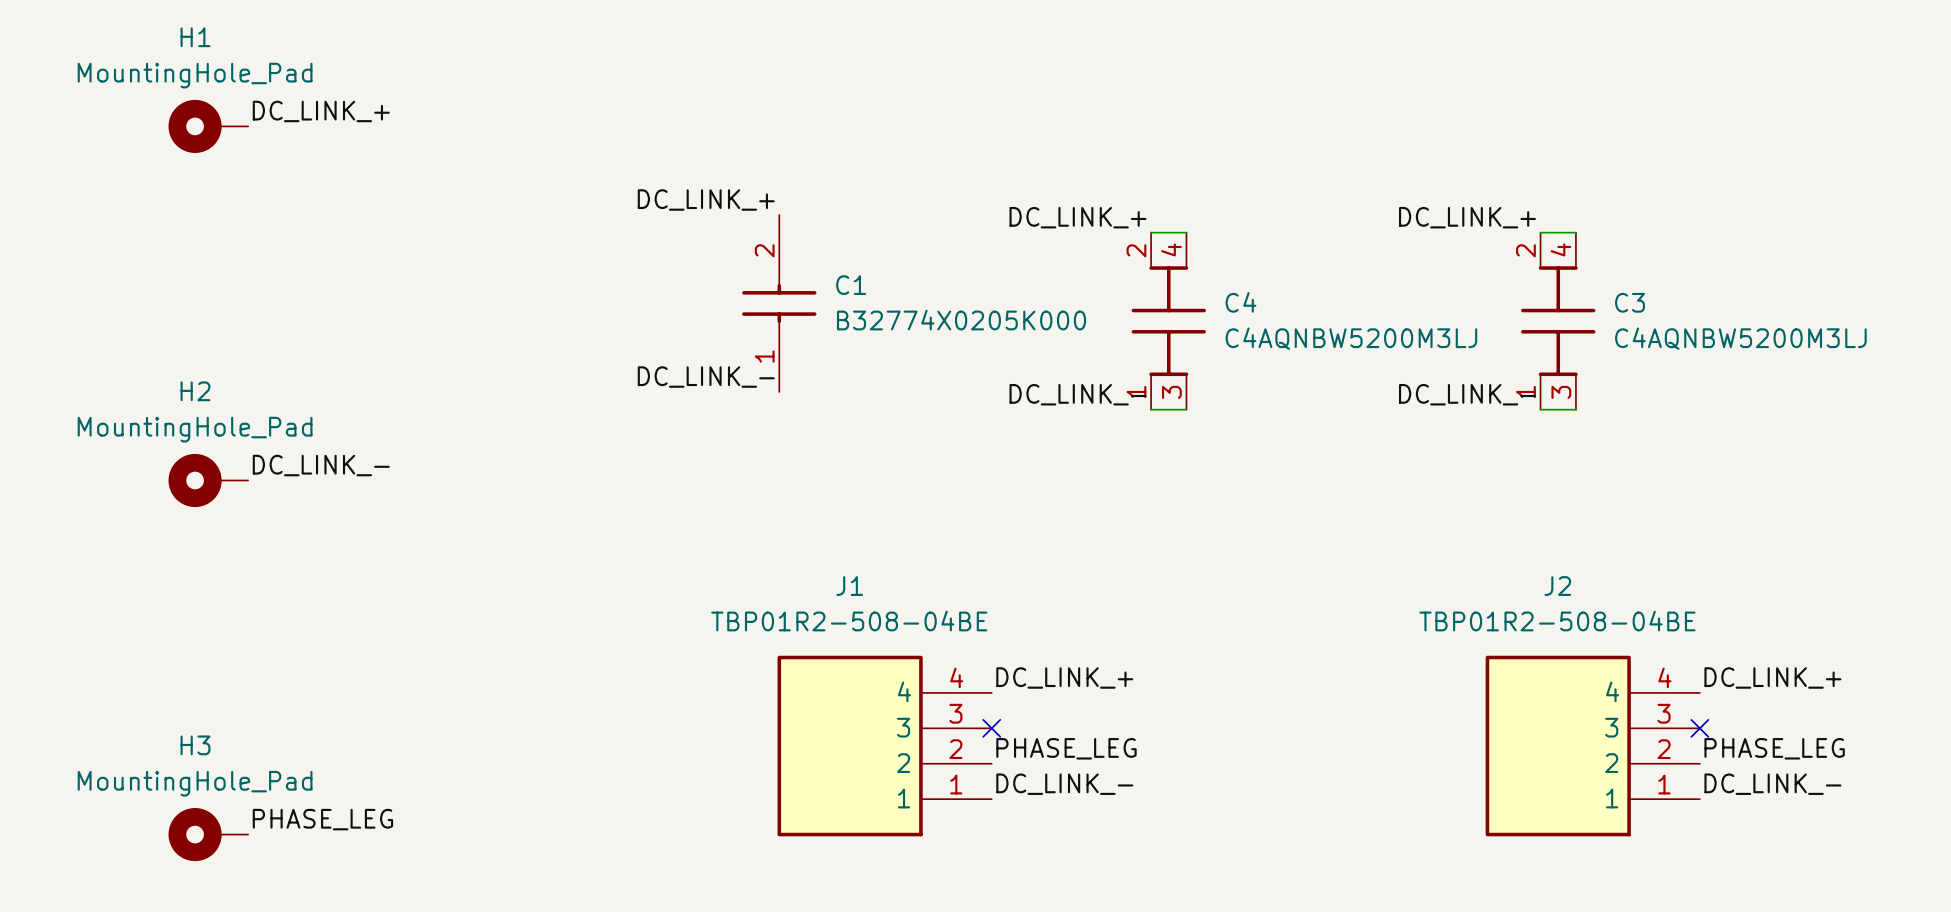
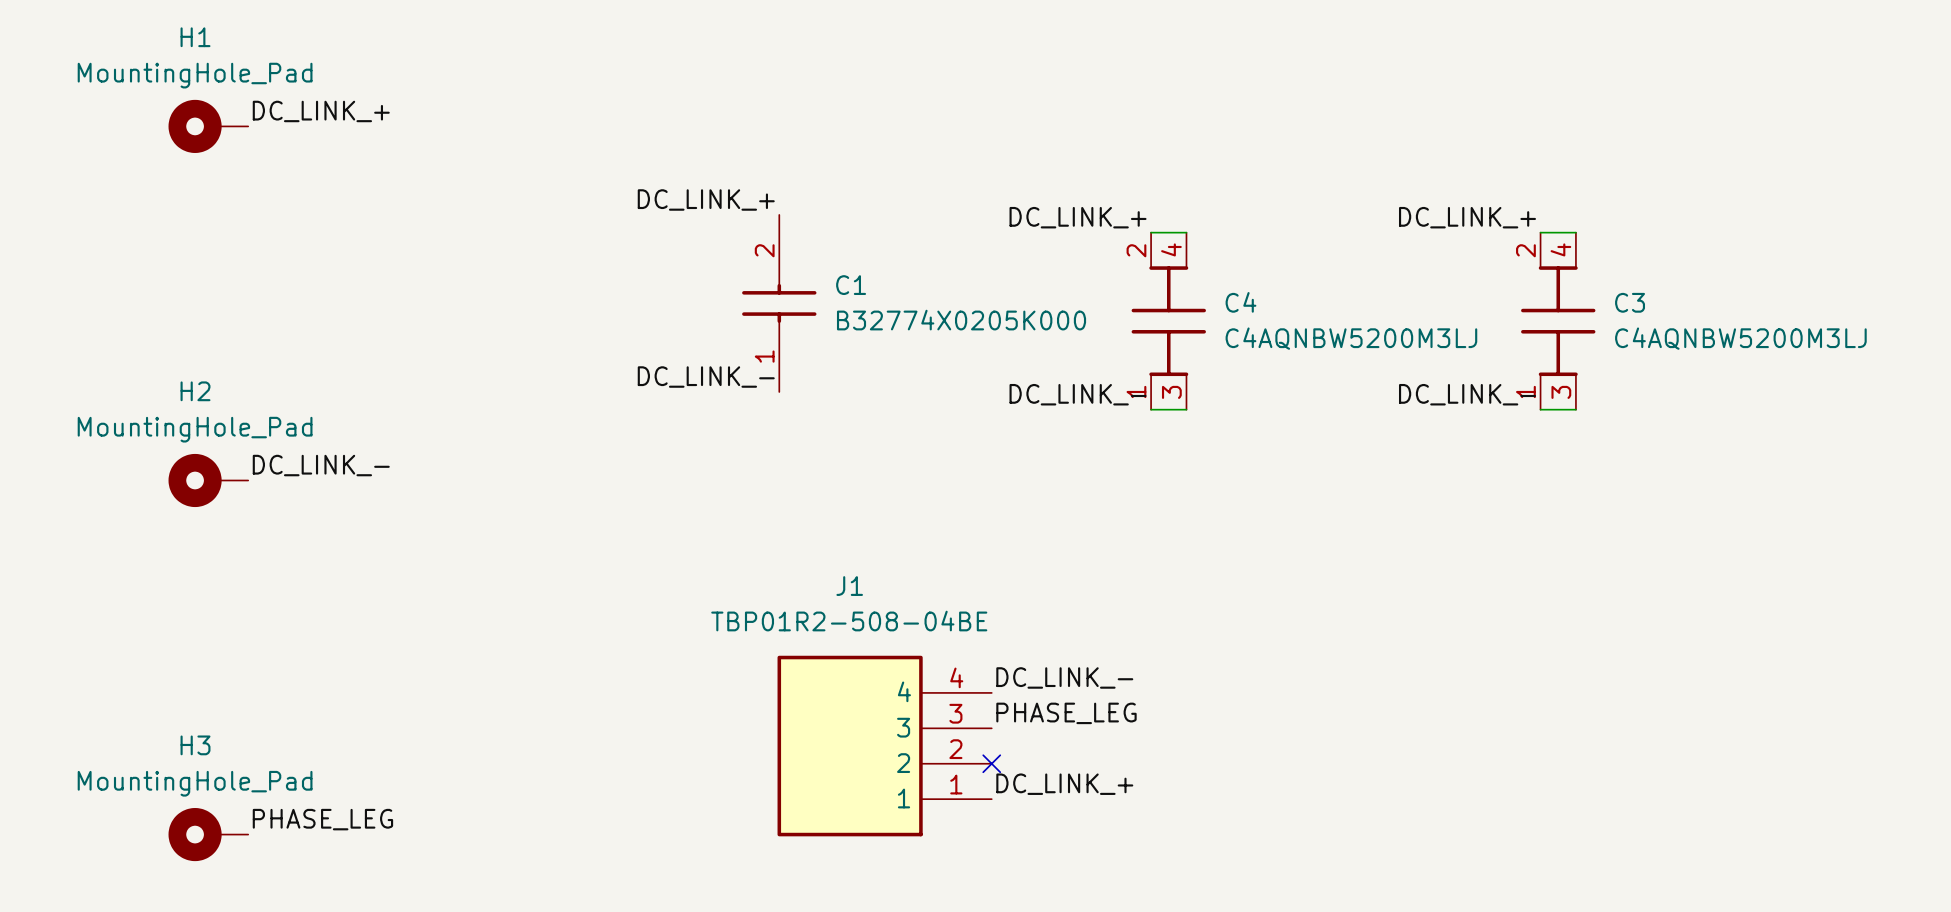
label: DC_LINK_+ (1064, 677) -> DC_LINK_- (1064, 677)
label: DC_LINK_+ (1772, 677) -> none
no-connect mark position: (991, 728) -> (991, 763)
no-connect mark: (1699, 728) -> none
J2: TBP01R2-508-04BE (1592, 746) -> none
label position: PHASE_LEG (1066, 748) -> PHASE_LEG (1066, 713)
label: PHASE_LEG (1774, 748) -> none
label: DC_LINK_- (1064, 784) -> DC_LINK_+ (1064, 784)
label: DC_LINK_- (1772, 784) -> none

